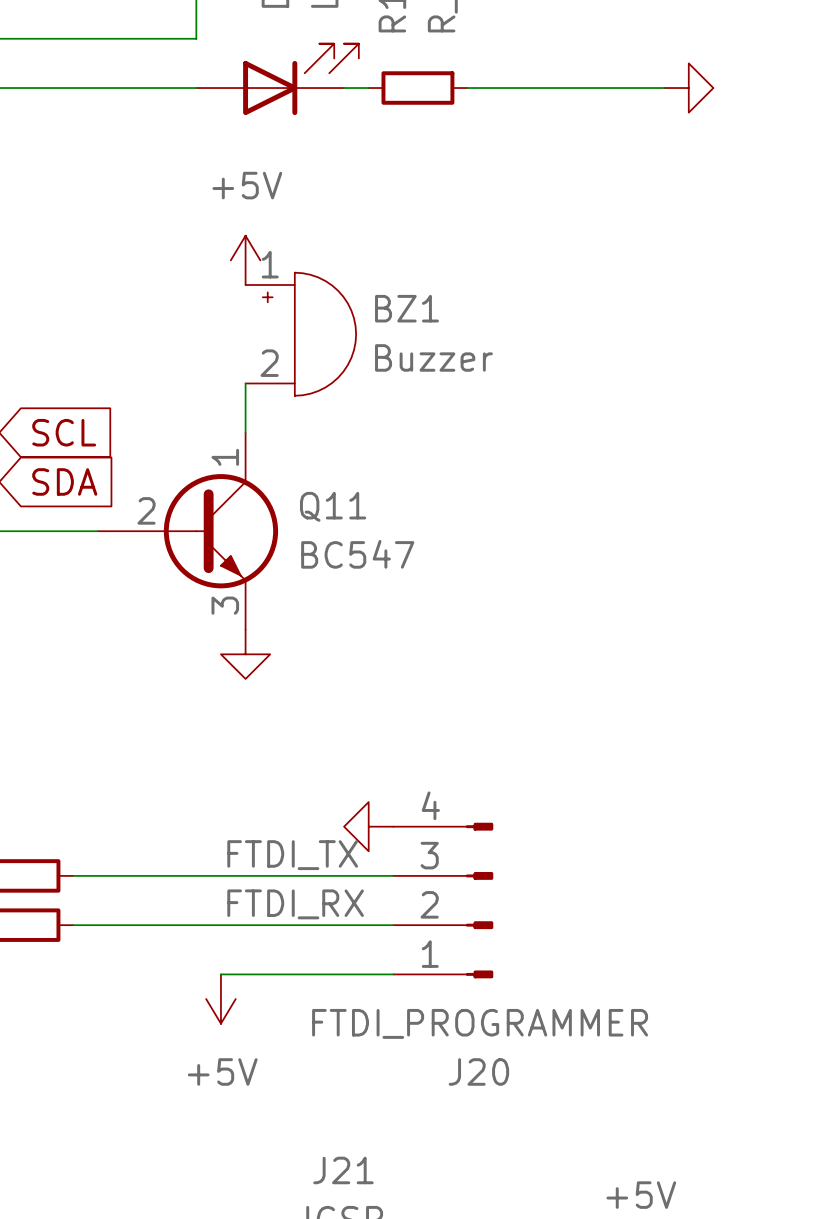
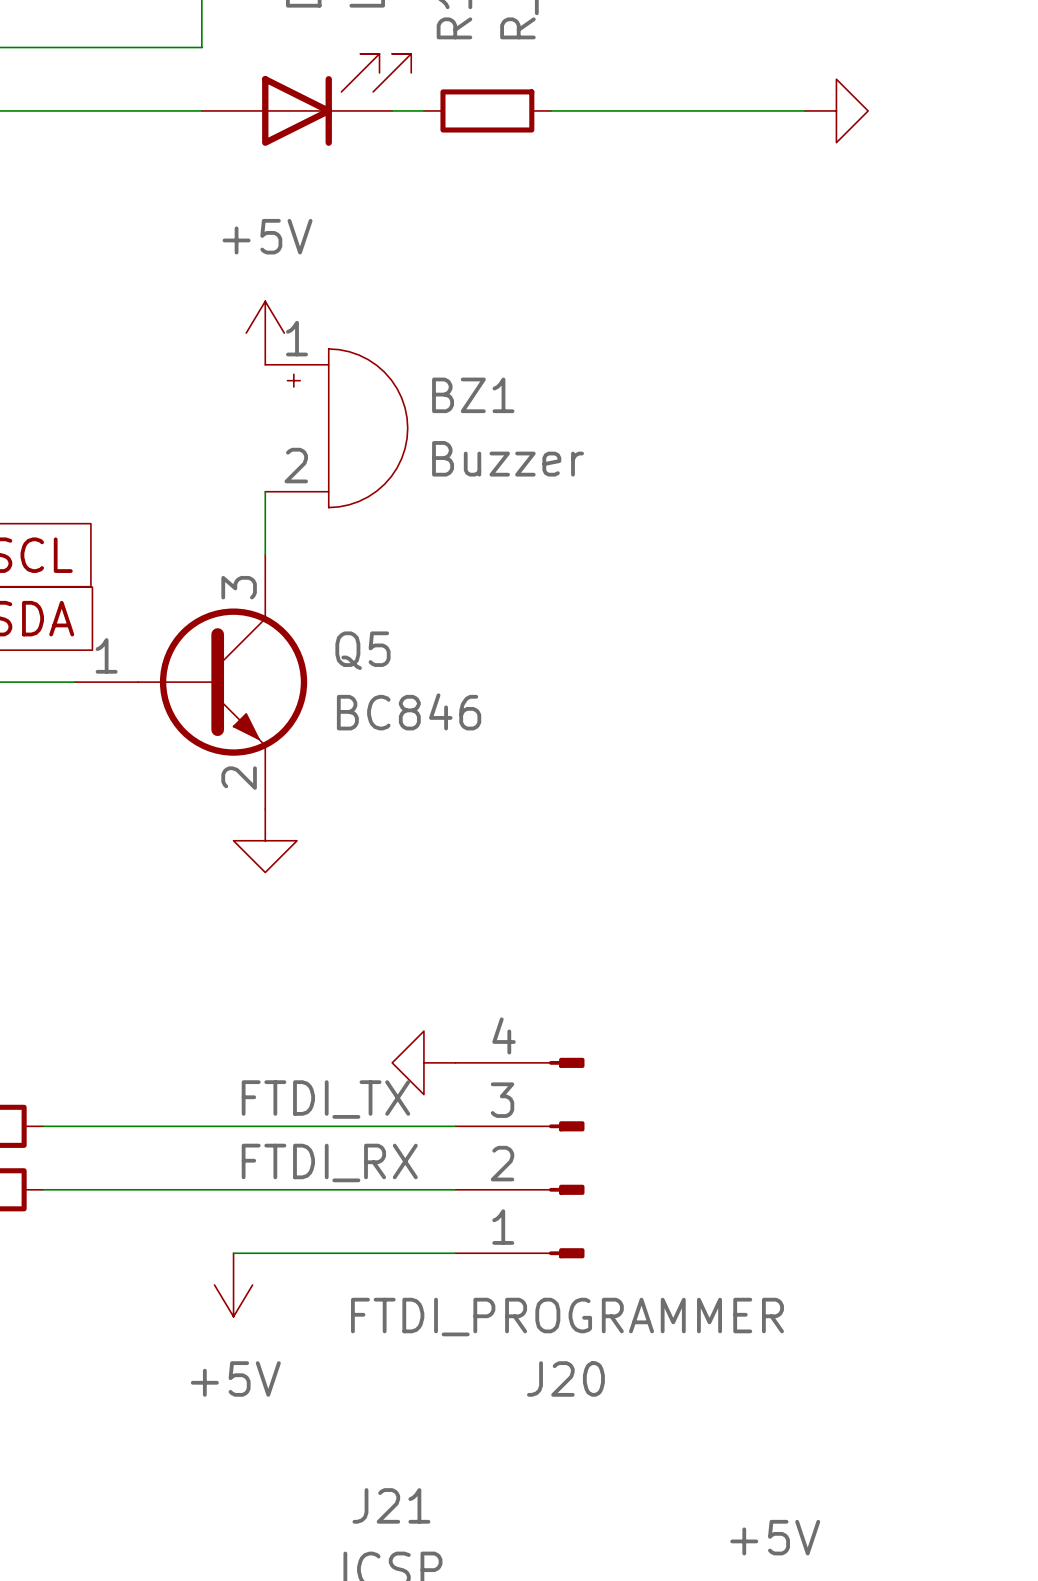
Q11: BC547 (187, 531) -> none
Q5: none -> BC846 (191, 682)

